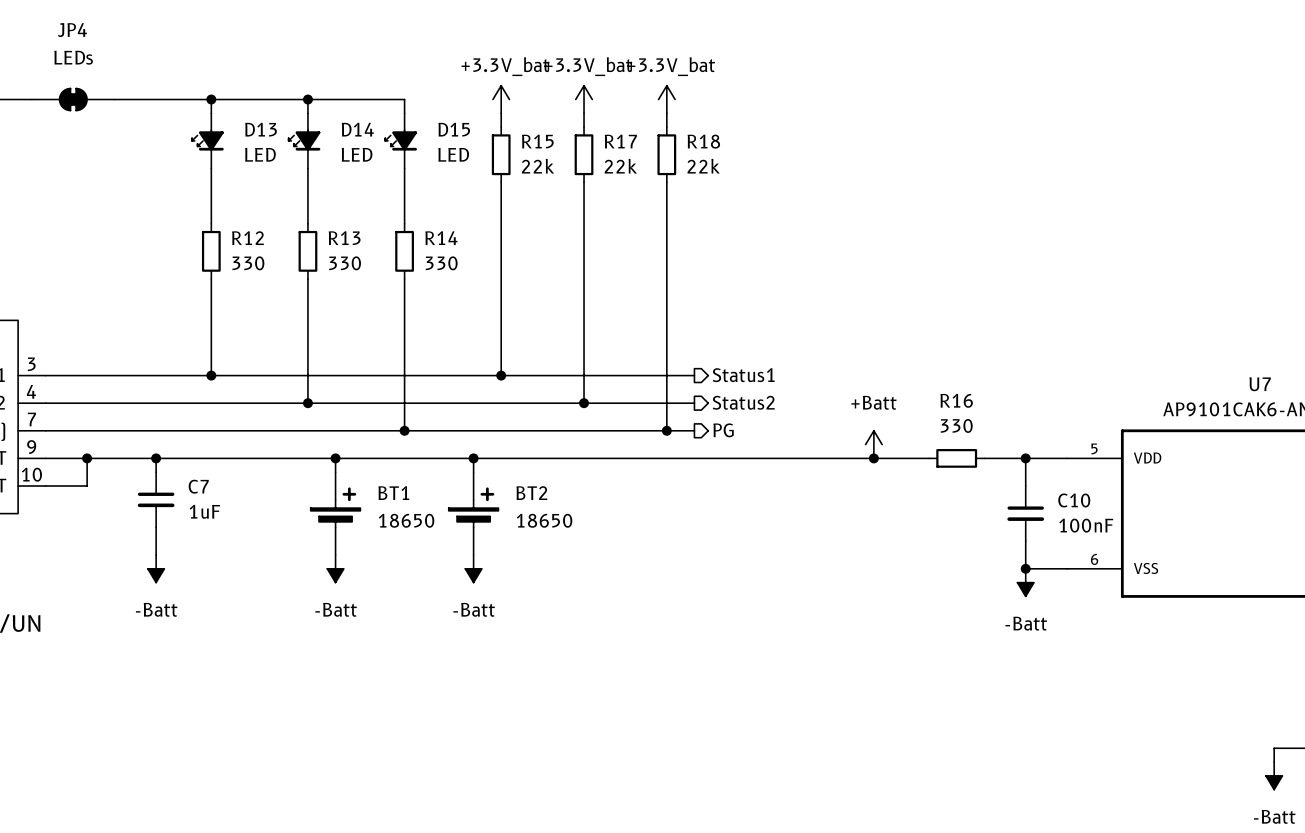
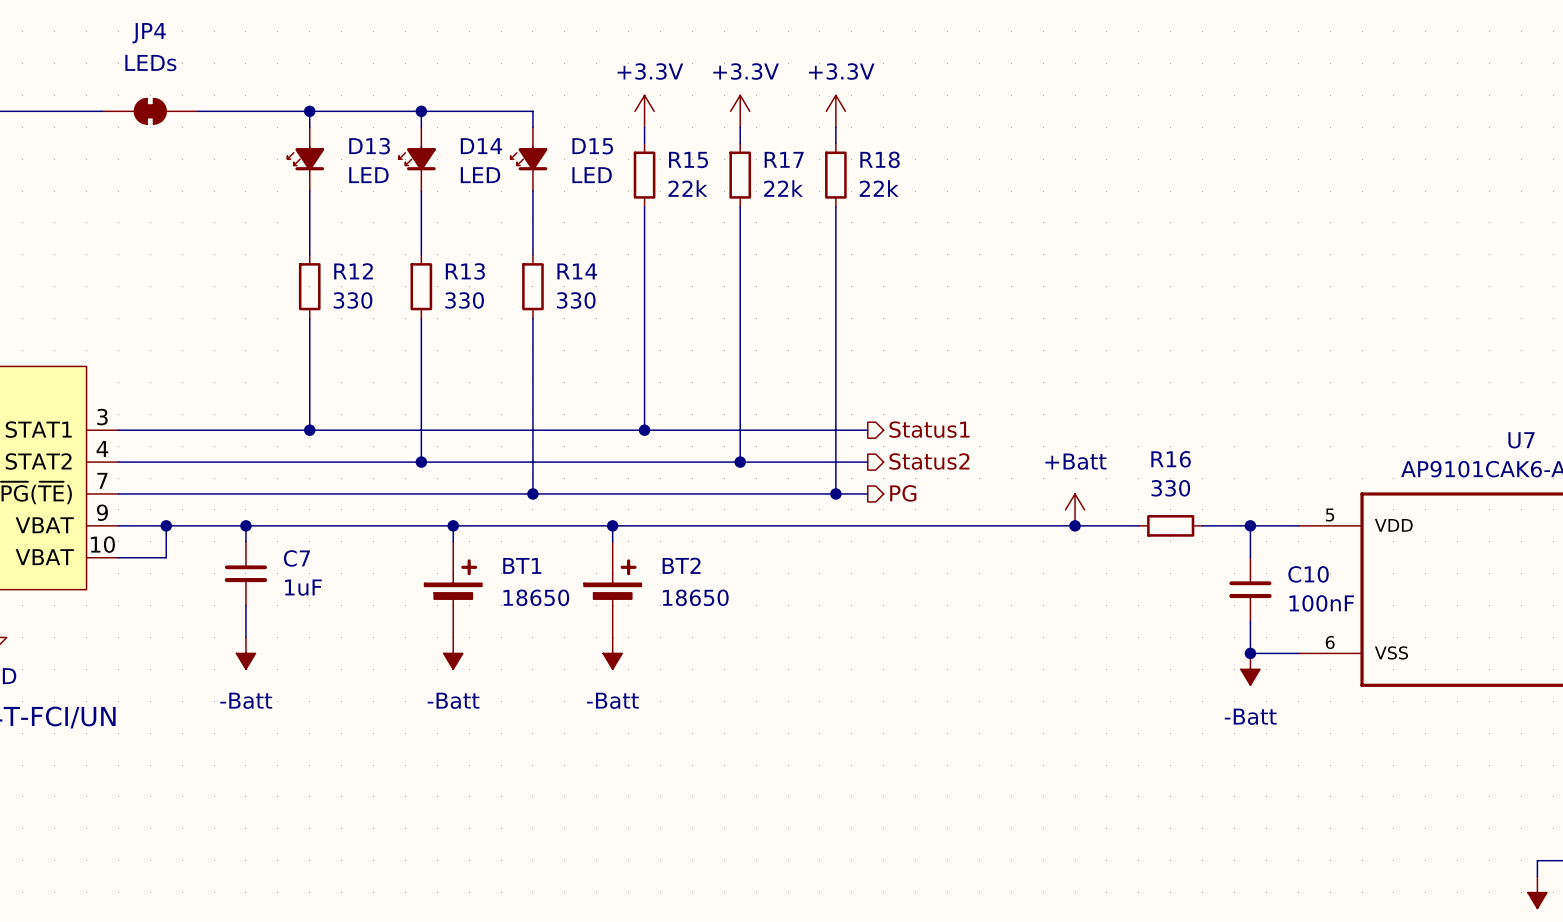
power symbol: +3.3V_bat (501, 99) -> +3.3V (644, 111)
power symbol: +3.3V_bat (584, 99) -> +3.3V (740, 111)
power symbol: +3.3V_bat (666, 99) -> +3.3V (835, 111)

